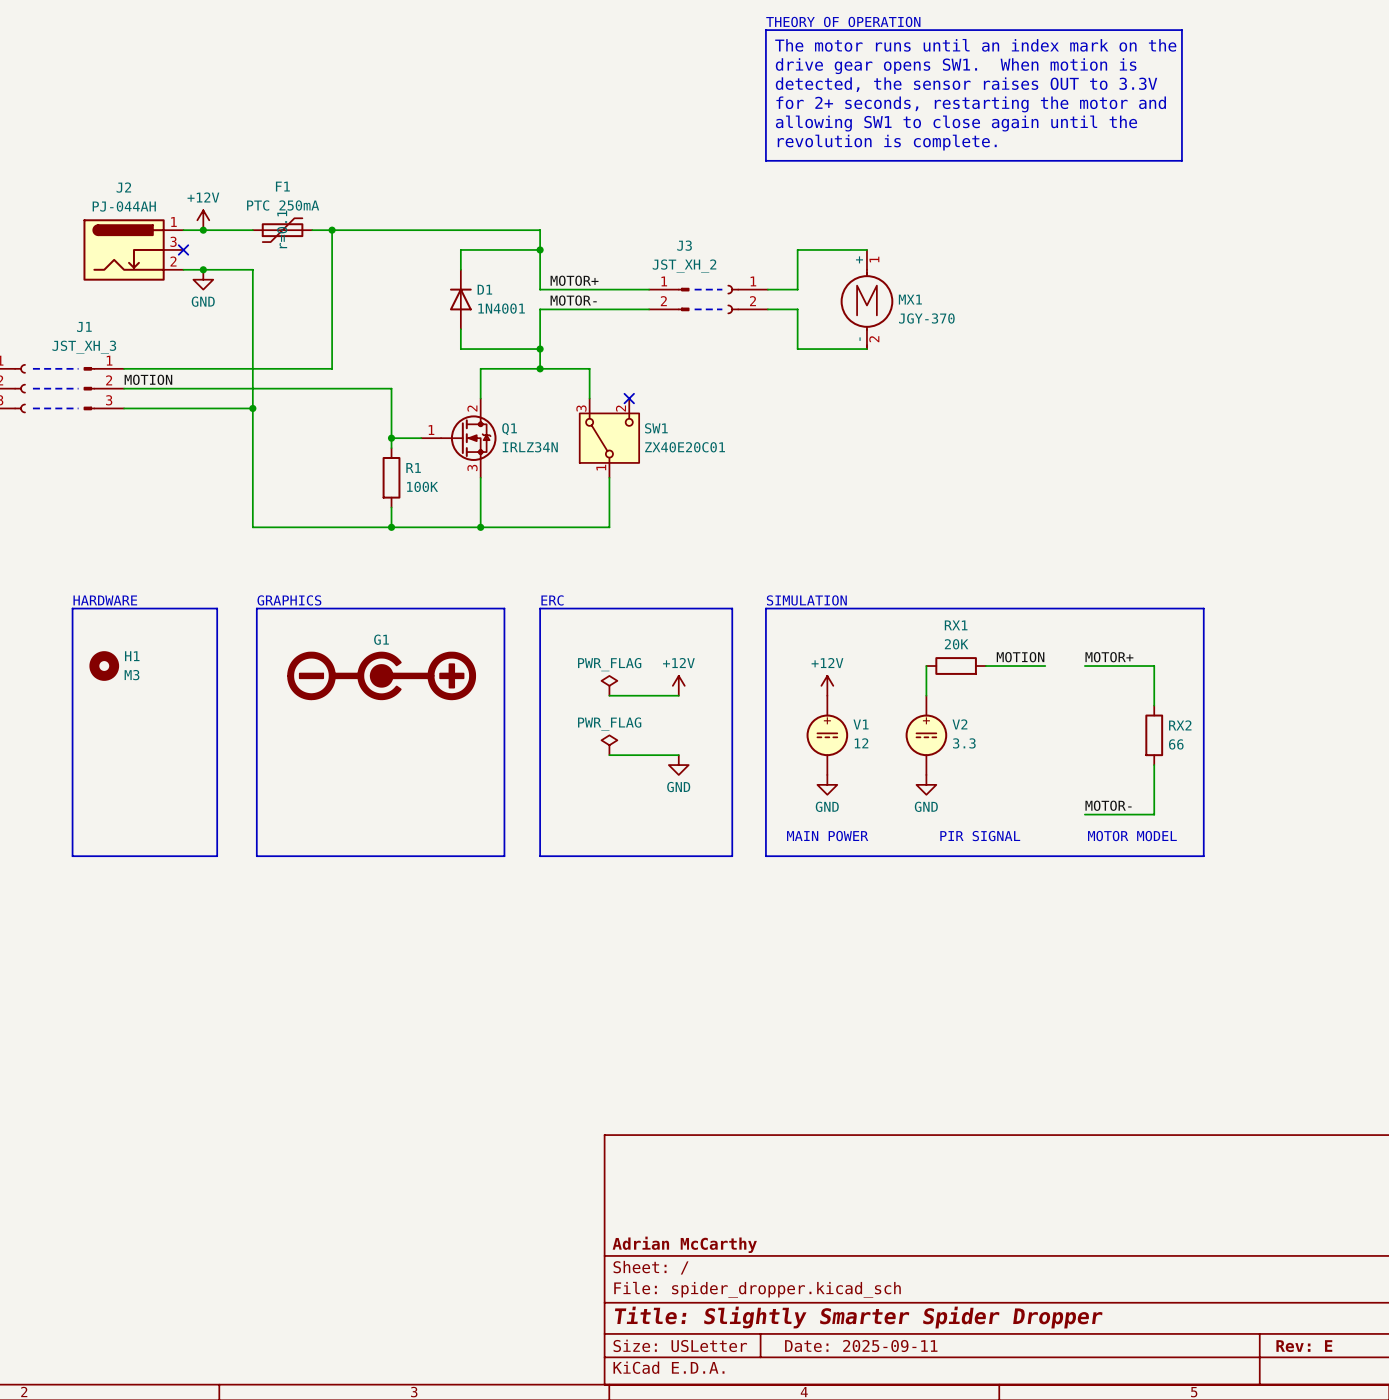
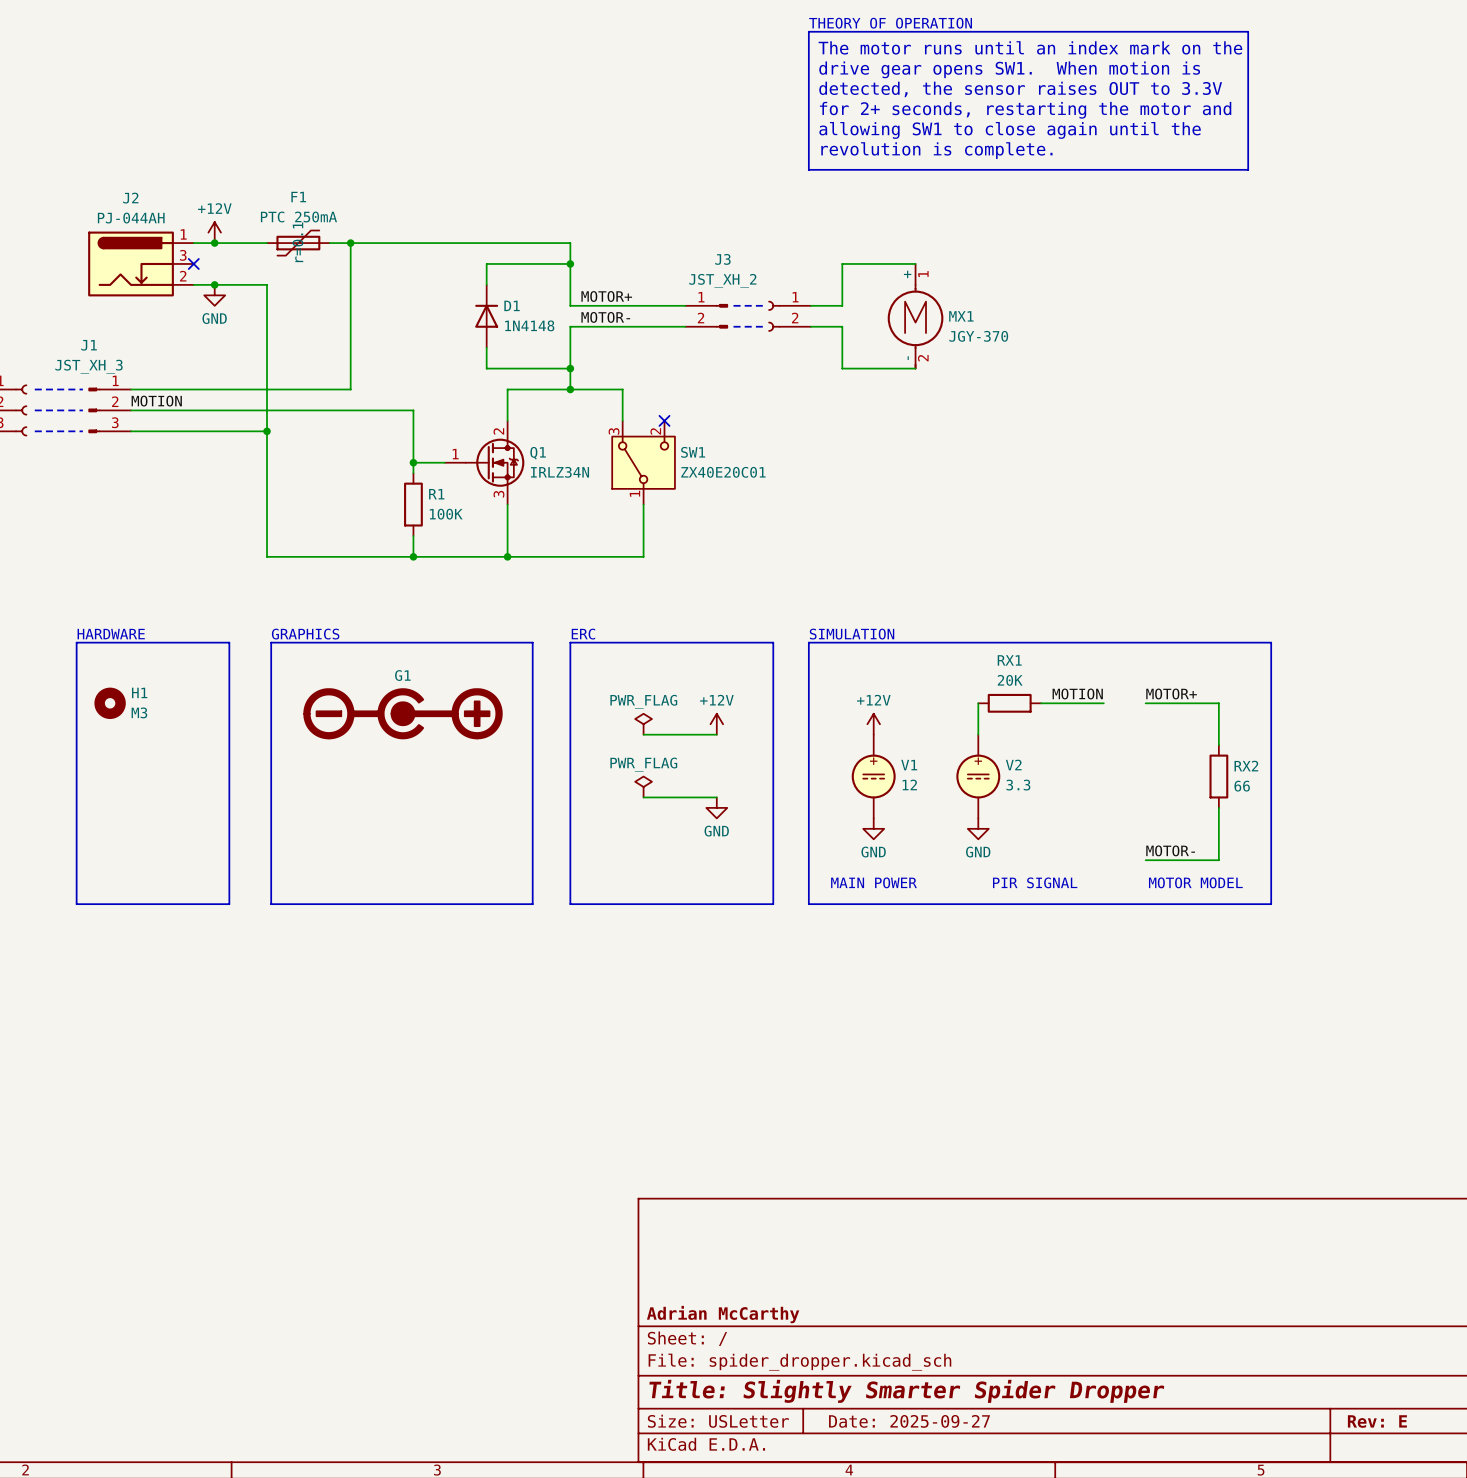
D1 value: 1N4001 (501, 308) -> 1N4148 (529, 325)
title block: Date: 2025-09-11 (861, 1346) -> Date: 2025-09-27 (909, 1421)

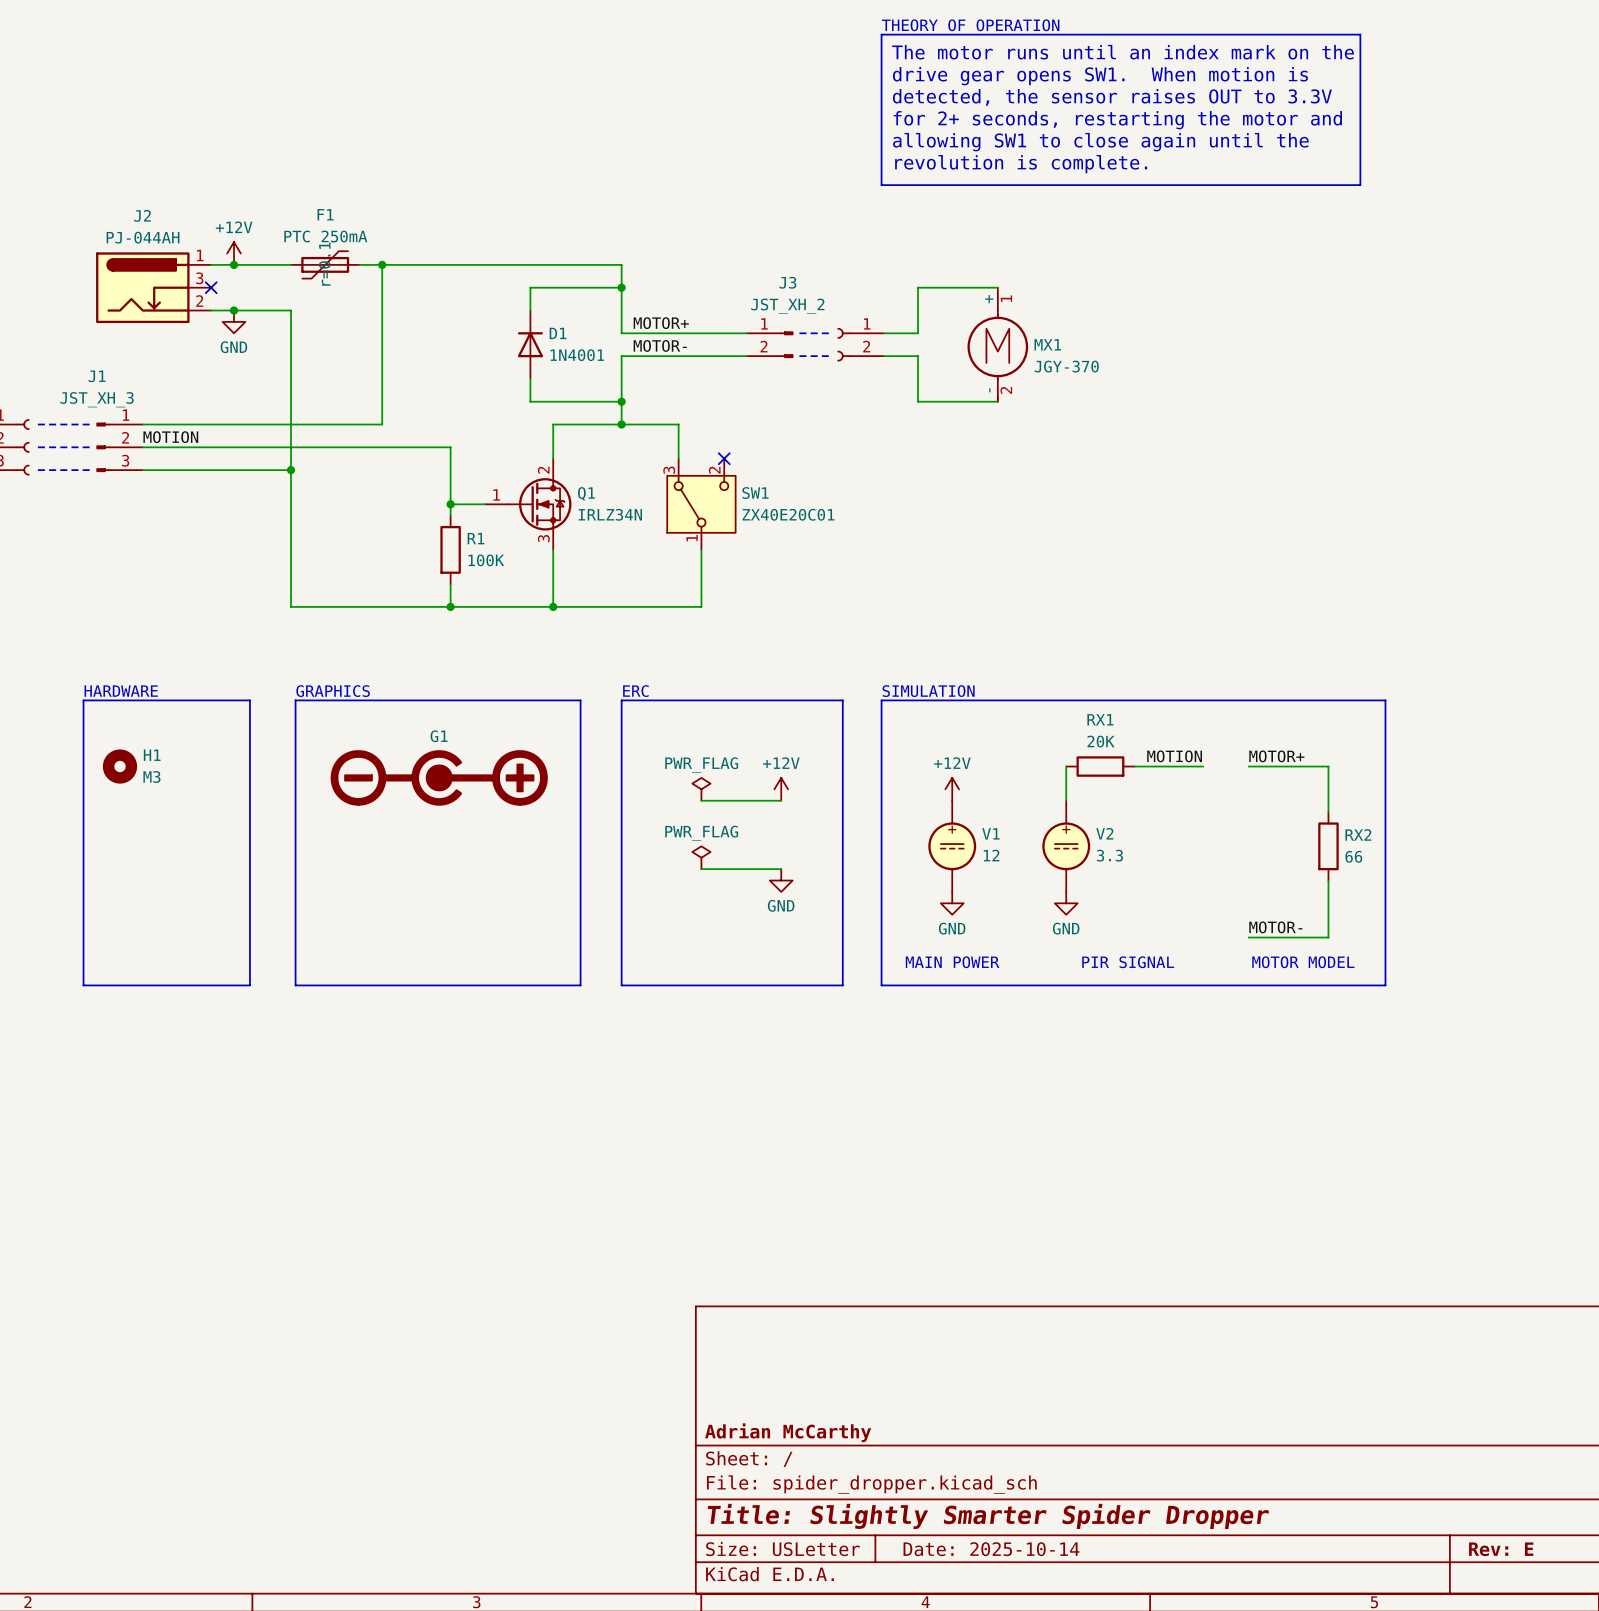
D1 value: 1N4148 (529, 325) -> 1N4001 (577, 355)
title block: Date: 2025-09-27 (909, 1421) -> Date: 2025-10-14 (991, 1549)

